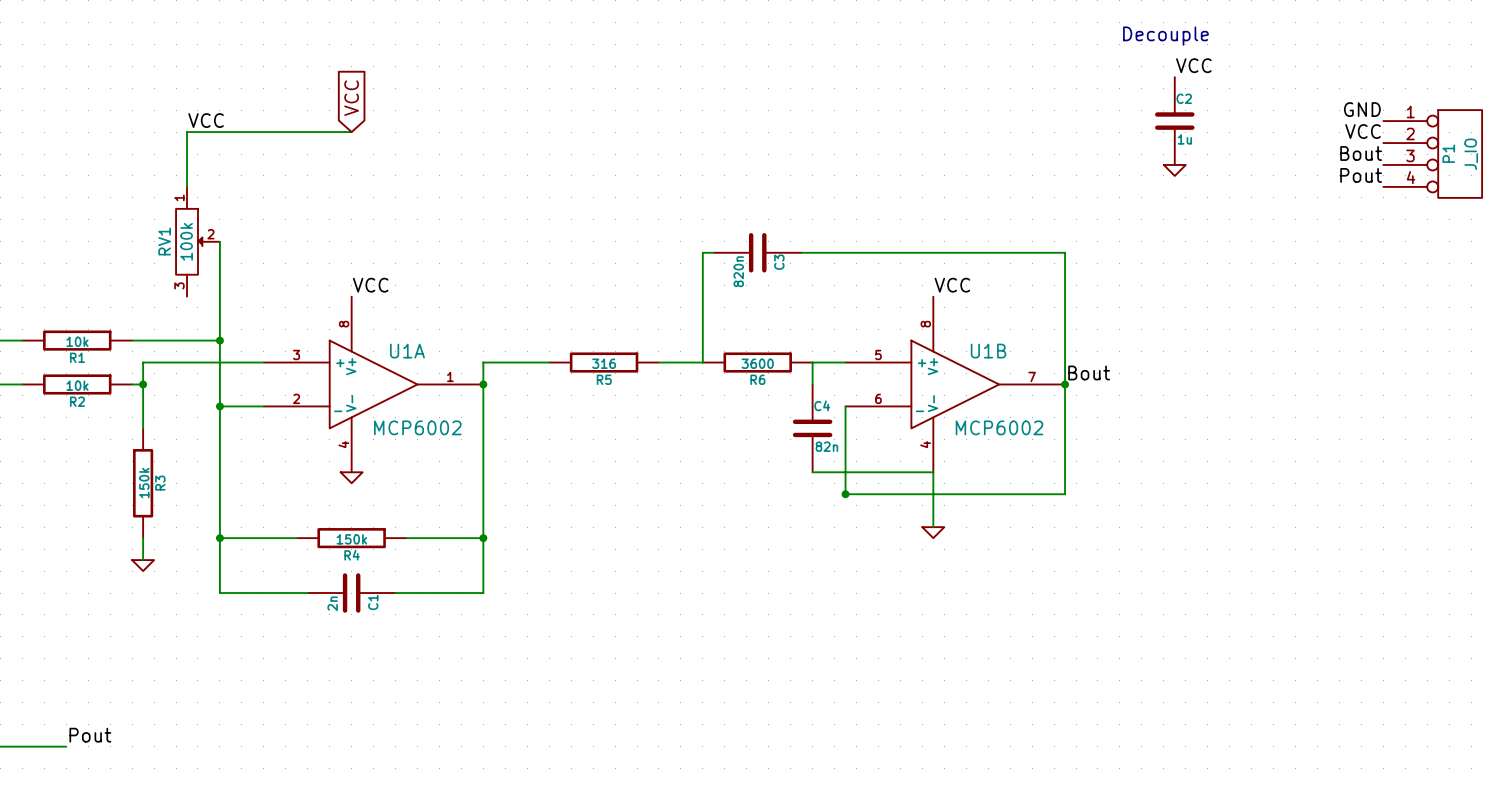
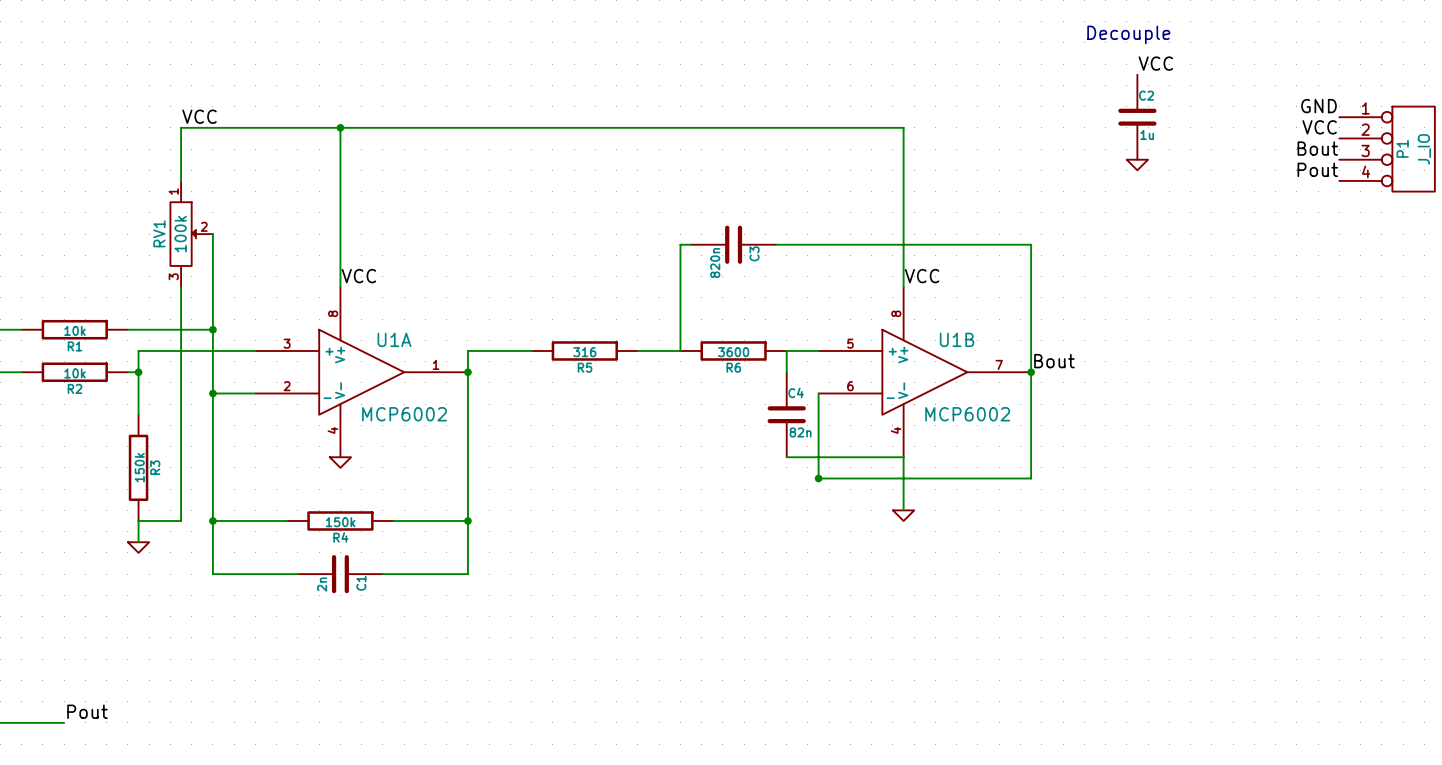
global label: VCC (351, 98) -> none
junction: none -> (340, 127)
wire: none -> (181, 287) (181, 521) (138, 521)
wire: none -> (340, 287) (340, 127) (903, 127) (903, 287)

